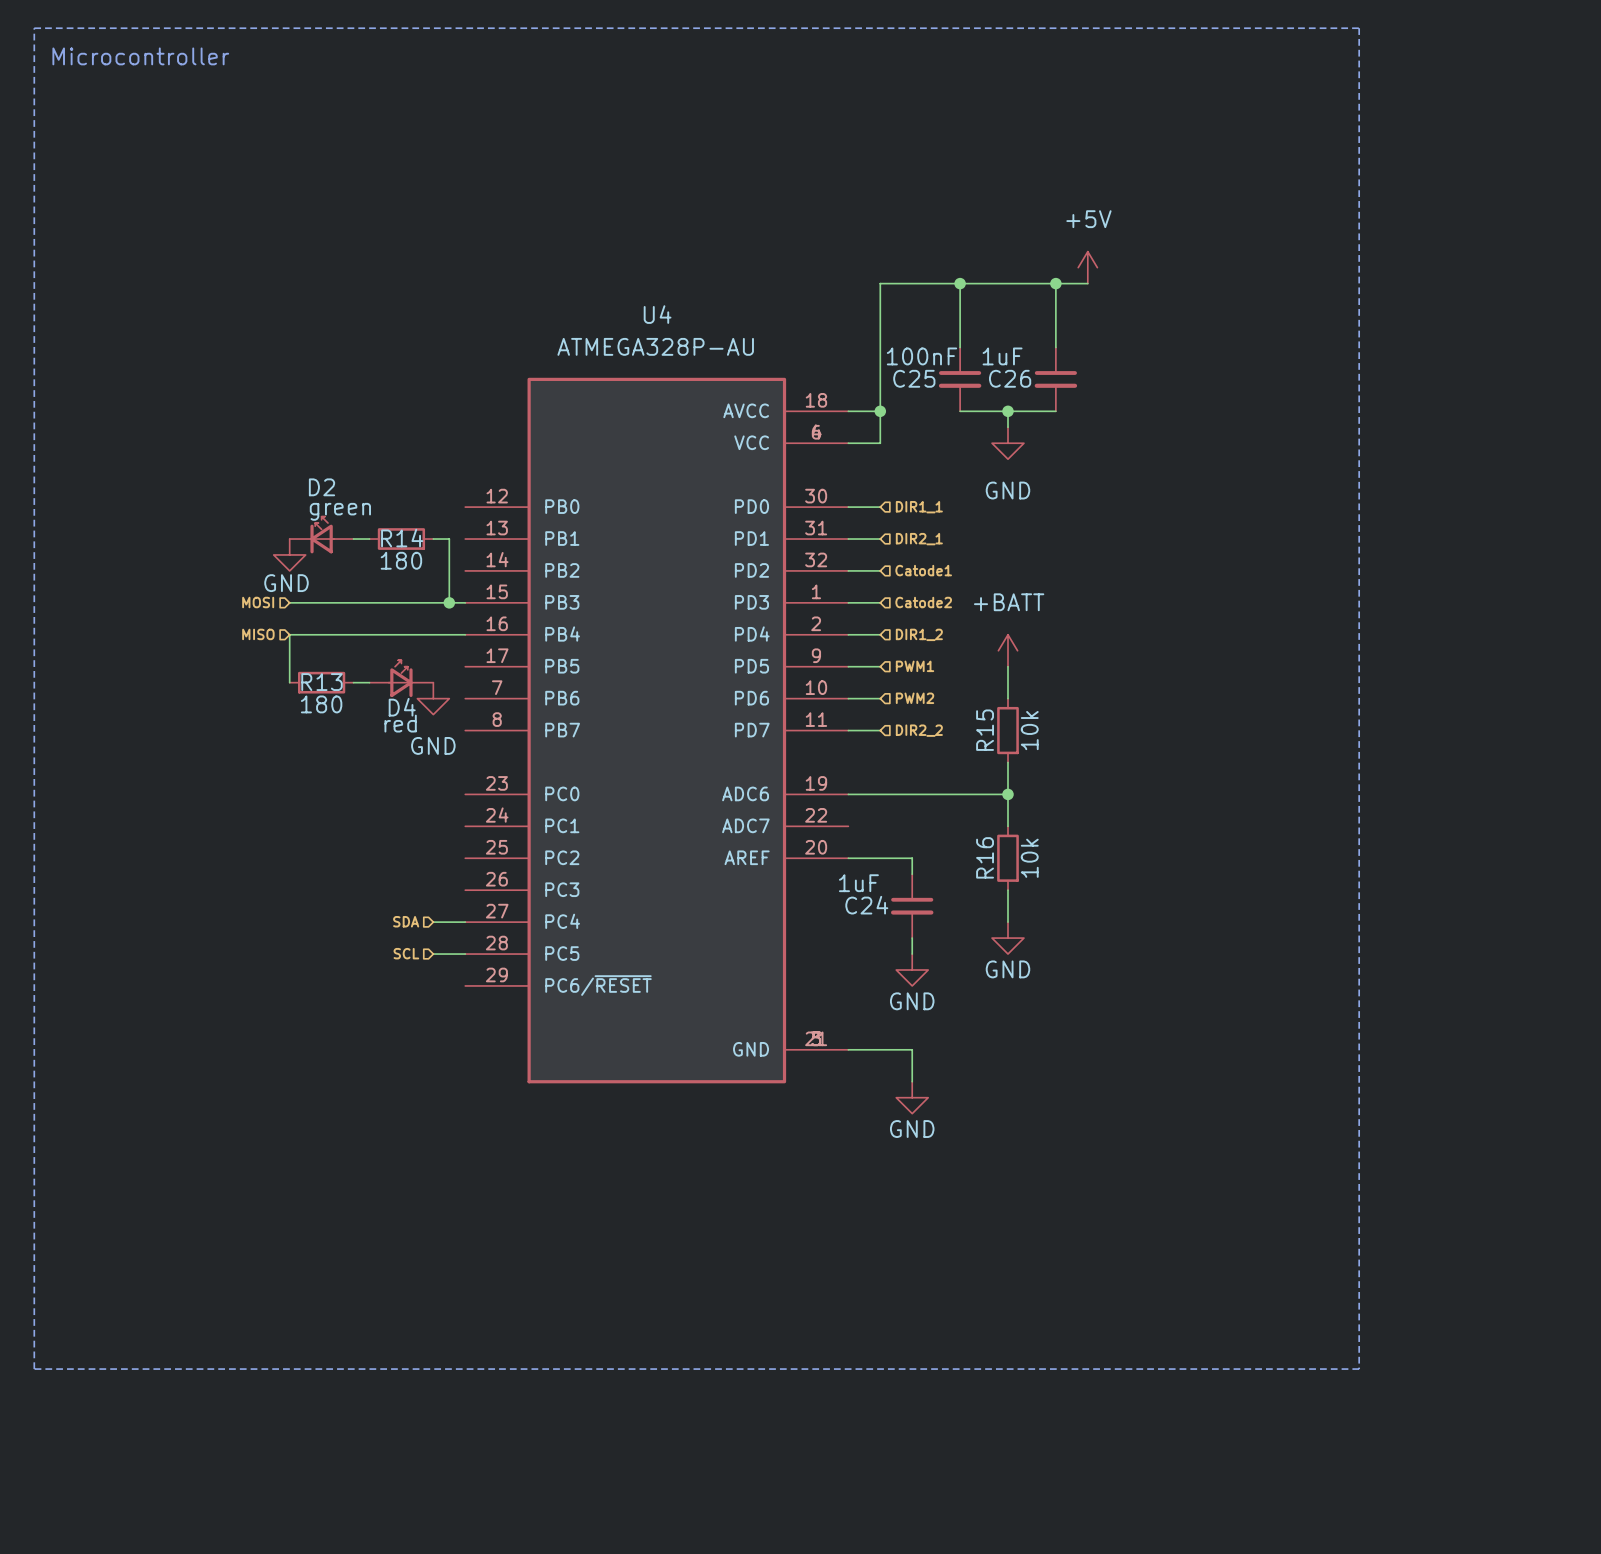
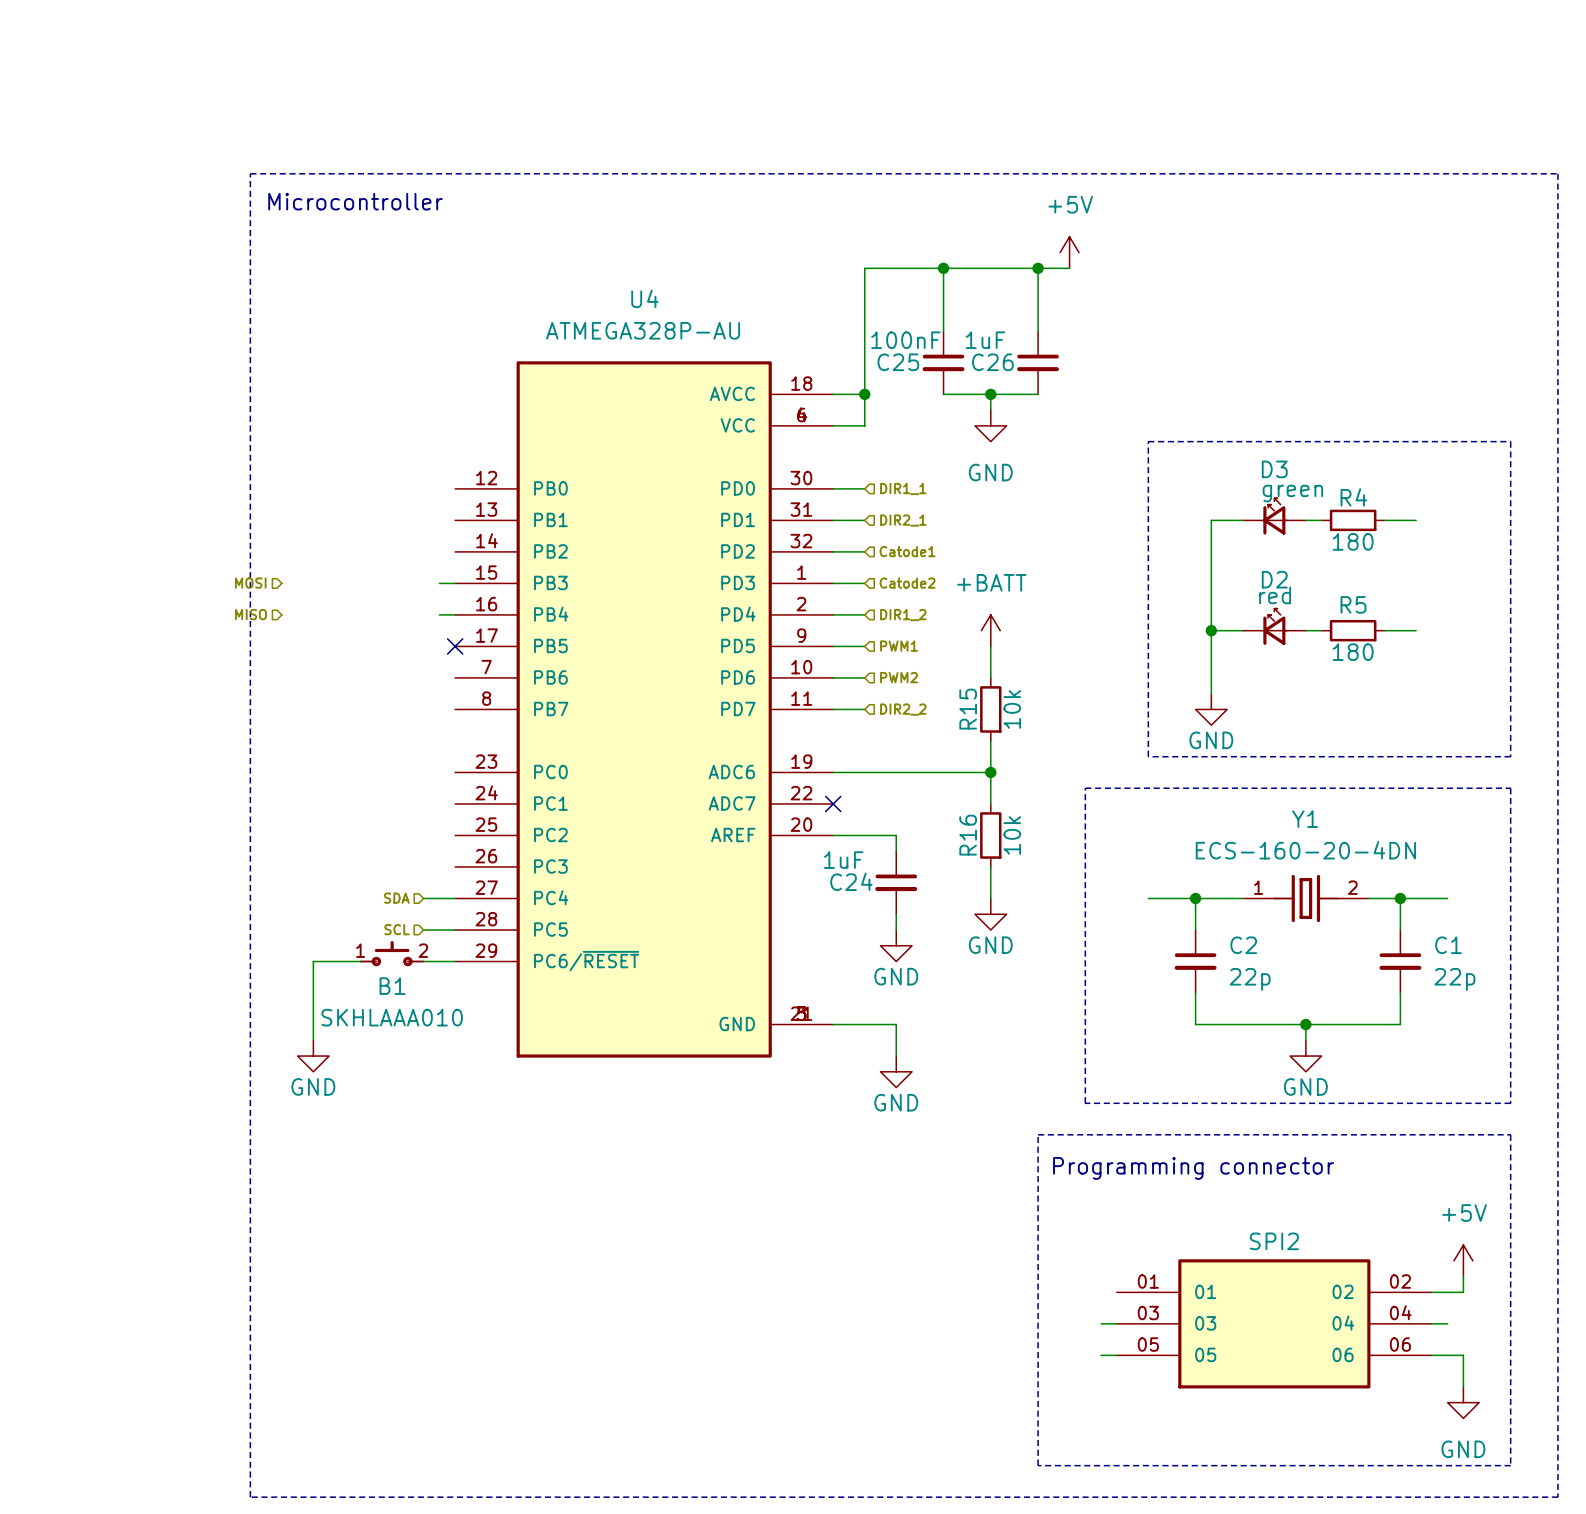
line: (34, 28) (1359, 28) (1359, 1369) (34, 1369) (34, 28) -> (250, 173) (1557, 173) (1557, 1497) (250, 1497) (250, 173)
text position: Microcontroller (140, 56) -> Microcontroller (355, 201)
line: none -> (1148, 441) (1510, 441) (1510, 756) (1148, 756) (1148, 441)
D2 value: green (340, 511) -> red (1275, 595)
D2 position: (321, 535) -> (1274, 626)
D3: none -> green (1274, 516)
wire: (353, 539) (369, 539) -> none
R14: 180 (401, 539) -> none
wire: (433, 539) (449, 539) (449, 602) (289, 602) -> none
wire: none -> (1242, 520) (1211, 520) (1211, 693)
wire: none -> (1305, 520) (1321, 520)
R4: none -> 180 (1353, 520)
wire: none -> (1384, 520) (1416, 520)
power symbol: GND (289, 554) -> none
junction: (449, 602) -> none
wire: (449, 634) (289, 634) (289, 682) -> none
wire: none -> (1211, 630) (1242, 630)
junction: none -> (1211, 630)
wire: none -> (1305, 630) (1321, 630)
R5: none -> 180 (1353, 630)
wire: none -> (1384, 630) (1416, 630)
no-connect mark: none -> (455, 646)
D4: red (401, 678) -> none
R13: 180 (321, 682) -> none
wire: (353, 682) (369, 682) -> none
power symbol: GND (433, 698) -> none
power symbol: none -> GND (1211, 709)
line: none -> (1085, 788) (1510, 788) (1510, 1103) (1085, 1103) (1085, 788)
no-connect mark: none -> (833, 803)
wire: none -> (1148, 898) (1242, 898)
wire: none -> (1195, 898) (1195, 930)
junction: none -> (1195, 898)
Y1: none -> ECS-160-20-4DN (1305, 898)
wire: none -> (1368, 898) (1447, 898)
wire: none -> (1400, 898) (1400, 930)
junction: none -> (1400, 898)
B1: none -> SKHLAAA010 (392, 953)
wire: none -> (360, 961) (313, 961) (313, 1040)
wire: none -> (423, 961) (455, 961)
C2: none -> 22p (1195, 961)
C1: none -> 22p (1400, 961)
wire: none -> (1195, 993) (1195, 1024) (1400, 1024) (1400, 993)
wire: none -> (1305, 1024) (1305, 1040)
junction: none -> (1305, 1024)
power symbol: none -> GND (313, 1056)
power symbol: none -> GND (1305, 1056)
line: none -> (1038, 1134) (1510, 1134) (1510, 1465) (1038, 1465) (1038, 1134)
text: none -> Programming connector (1193, 1168)
power symbol: none -> +5V (1463, 1260)
wire: none -> (1463, 1276) (1463, 1292) (1431, 1292)
wire: none -> (1101, 1323) (1116, 1323)
SPI2: none -> (1274, 1323)
wire: none -> (1431, 1323) (1447, 1323)
wire: none -> (1101, 1355) (1116, 1355)
wire: none -> (1431, 1355) (1463, 1355) (1463, 1386)
power symbol: none -> GND (1463, 1402)

